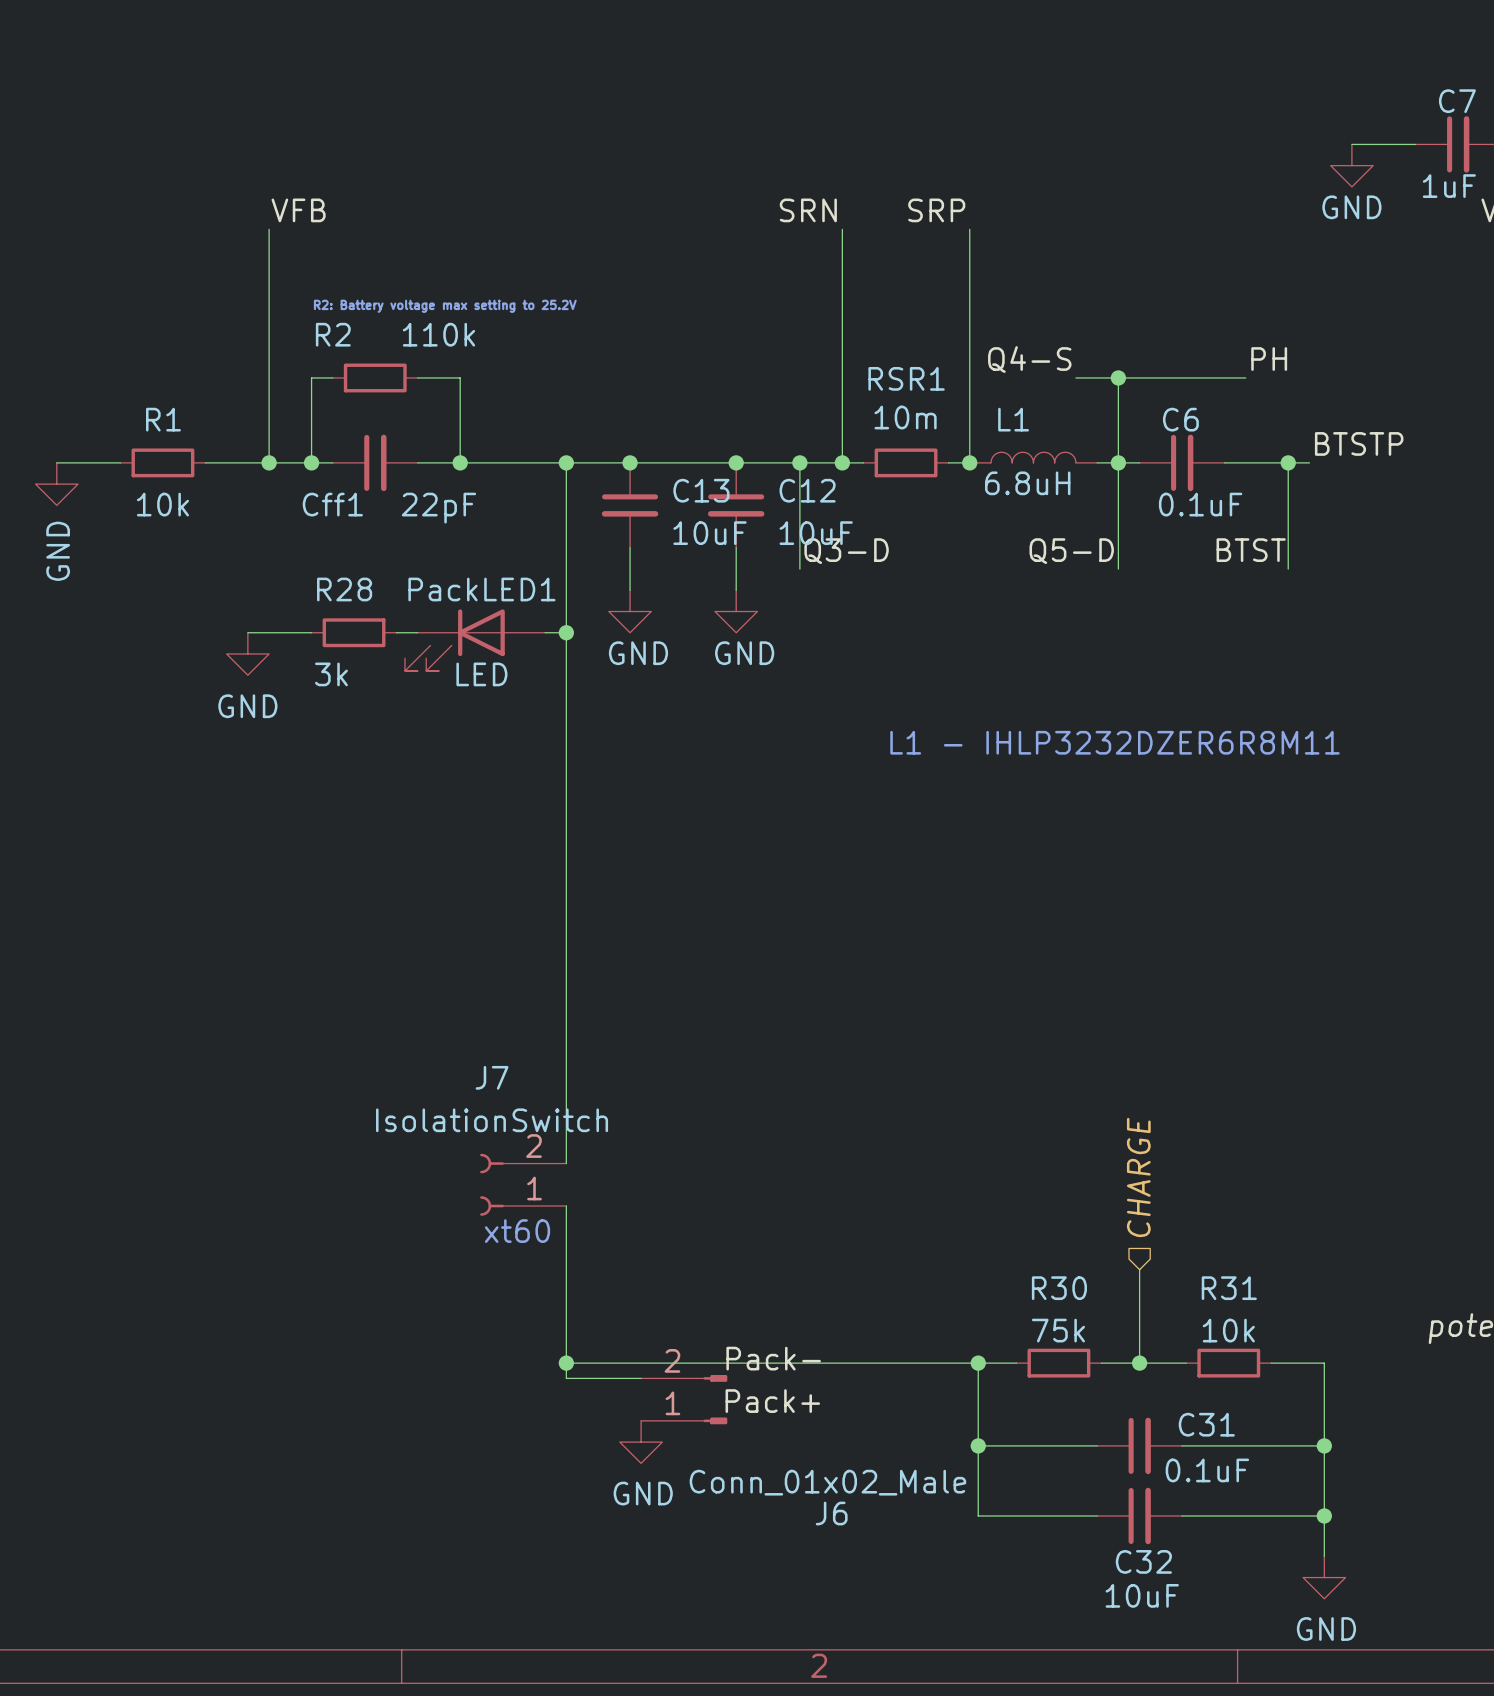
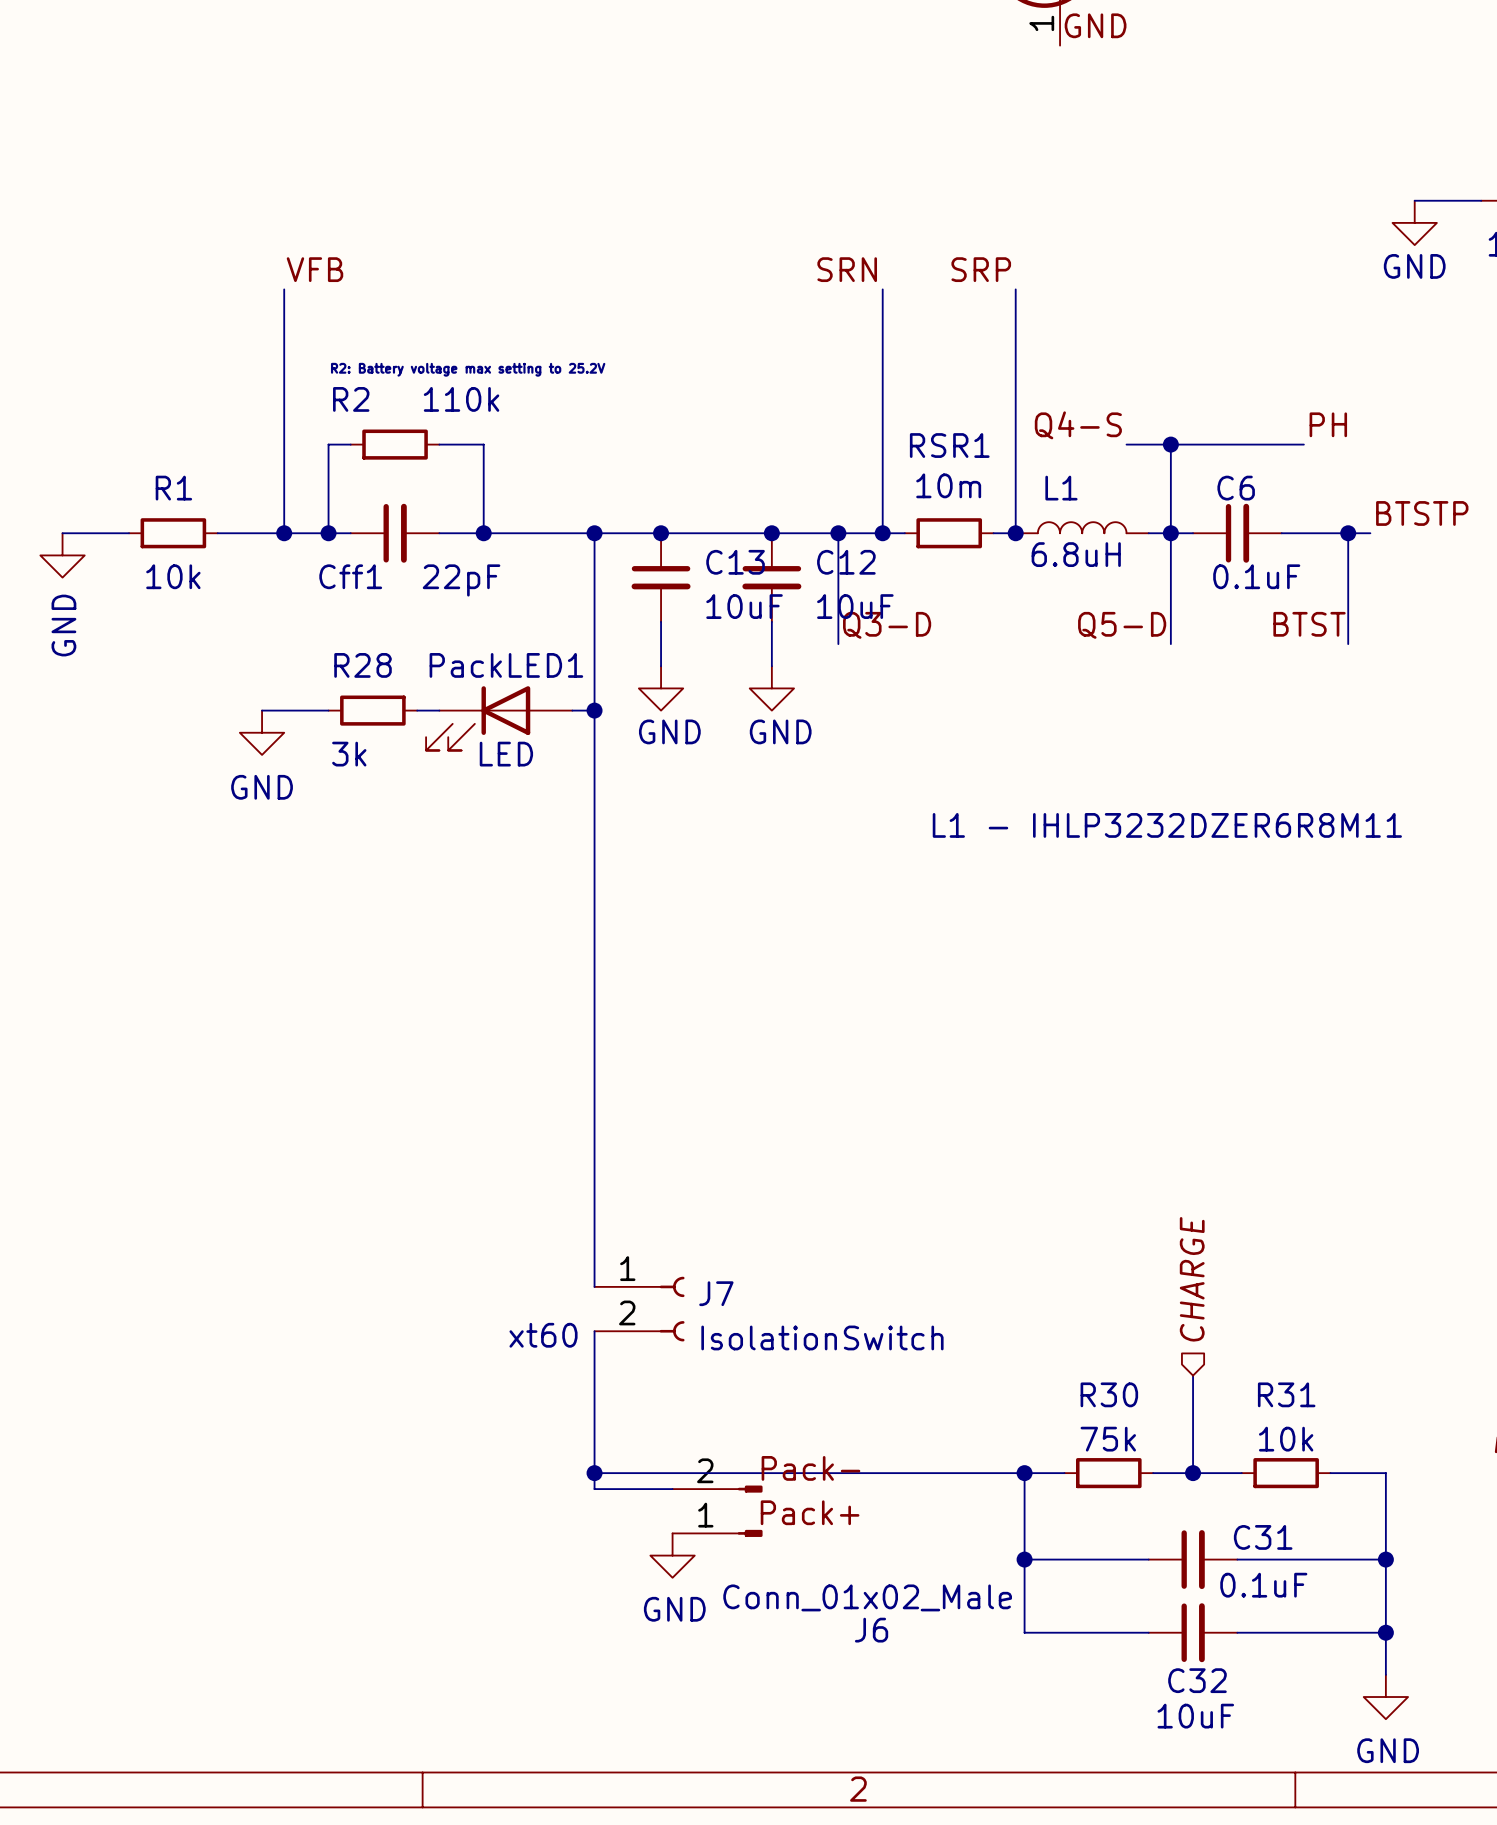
J7 name position: J7 (492, 1077) -> J7 (716, 1293)
J7 value position: IsolationSwitch (492, 1120) -> IsolationSwitch (822, 1337)
J7 rotation: 0° (492, 1184) -> 180° (672, 1309)
J7 position: (523, 1184) -> (639, 1309)
wire: (566, 1206) (566, 1227) -> (594, 1264) (594, 1286)

